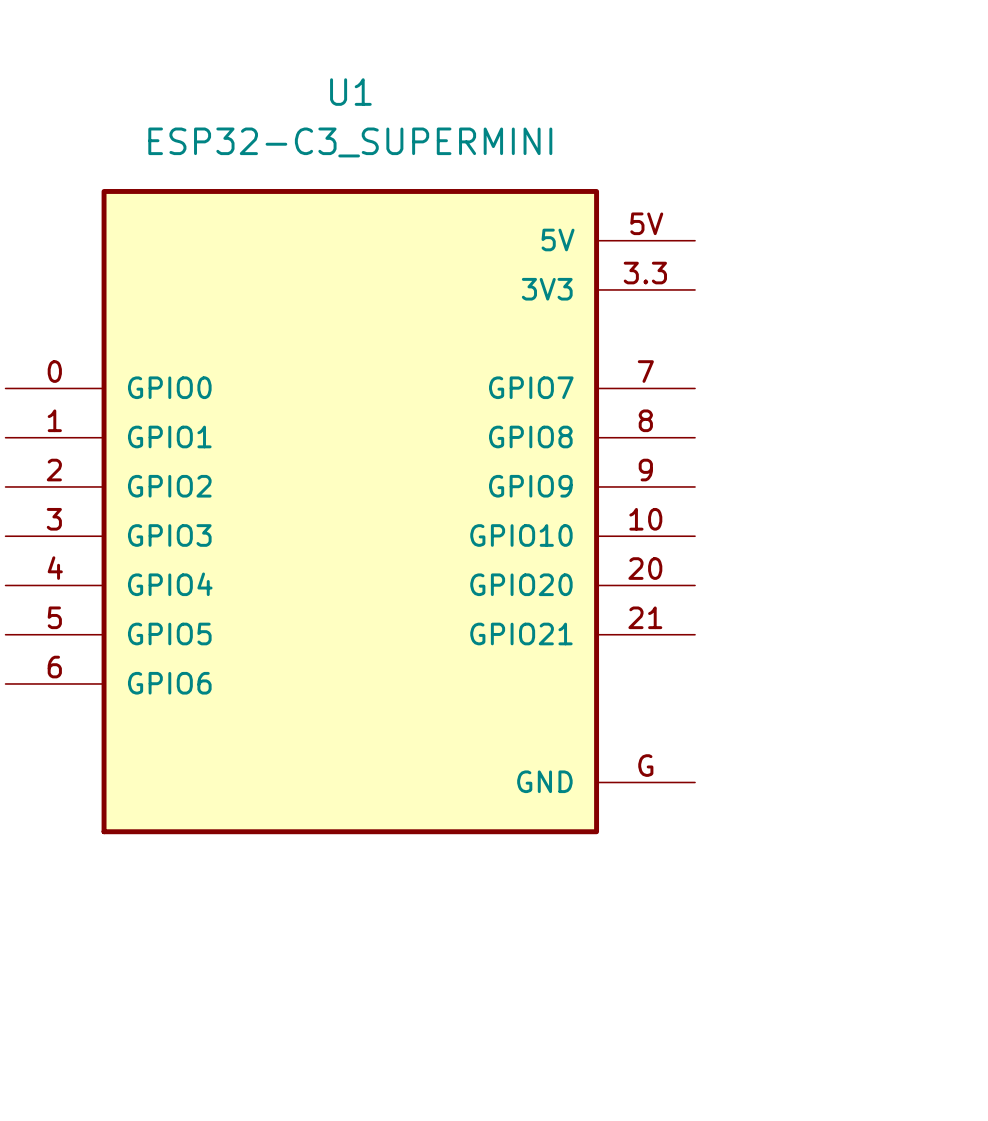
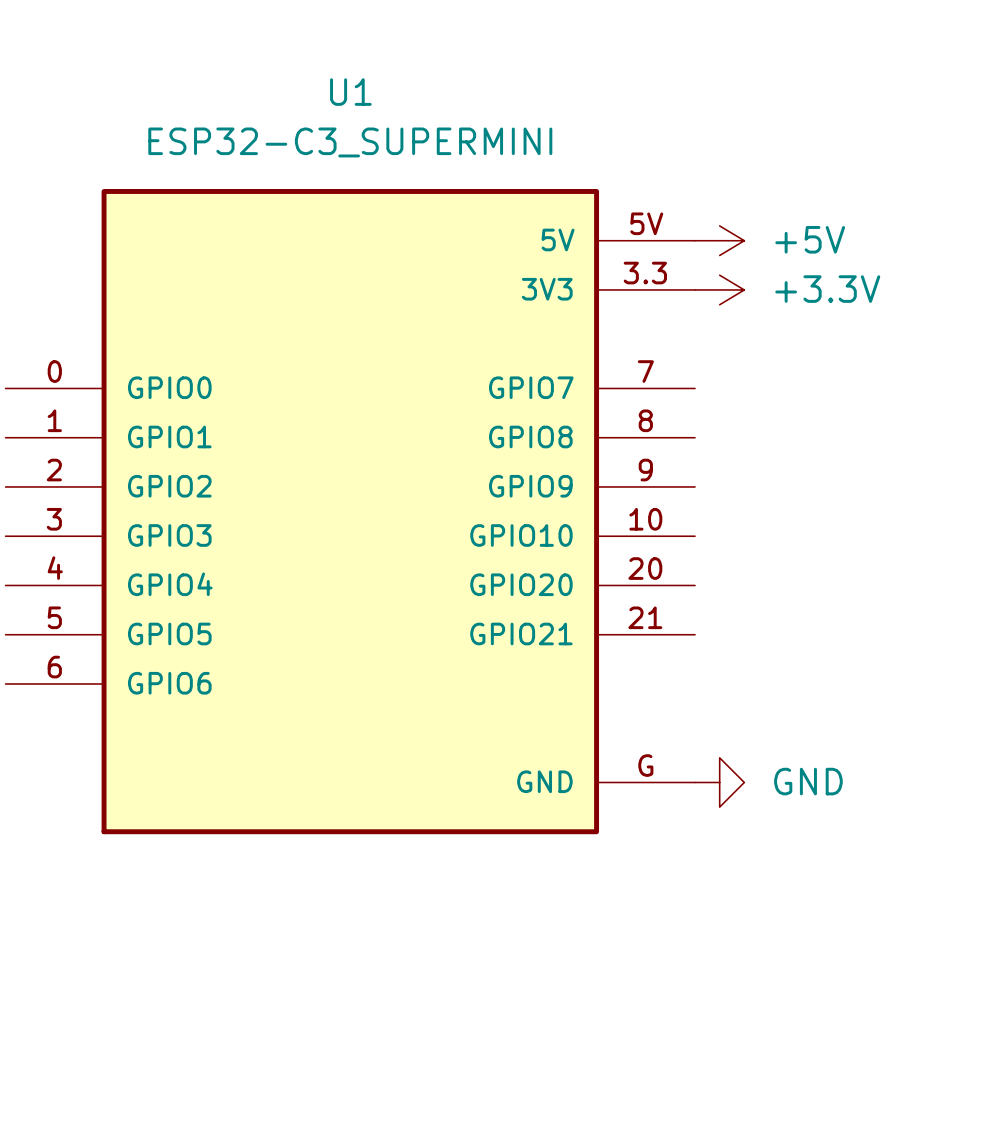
power symbol: none -> +5V (719, 240)
power symbol: none -> +3.3V (719, 289)
power symbol: none -> GND (719, 782)

